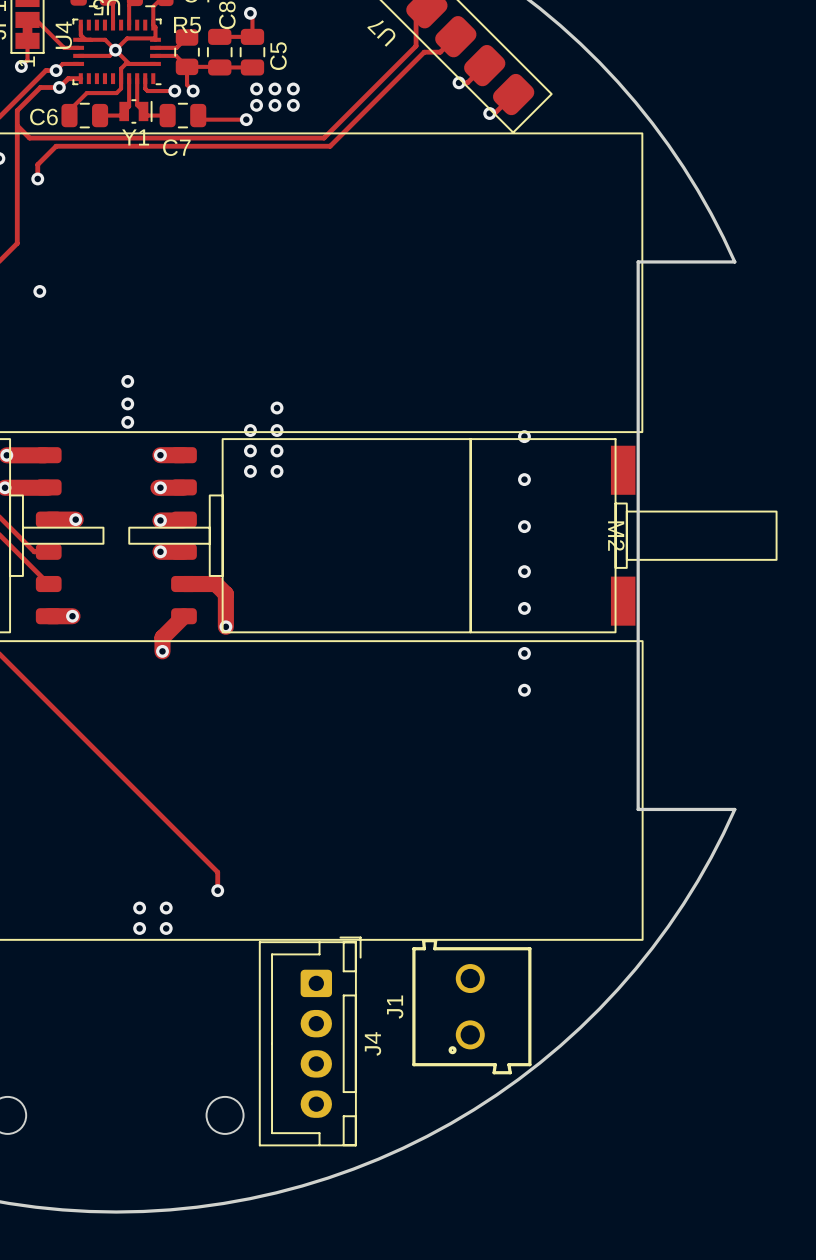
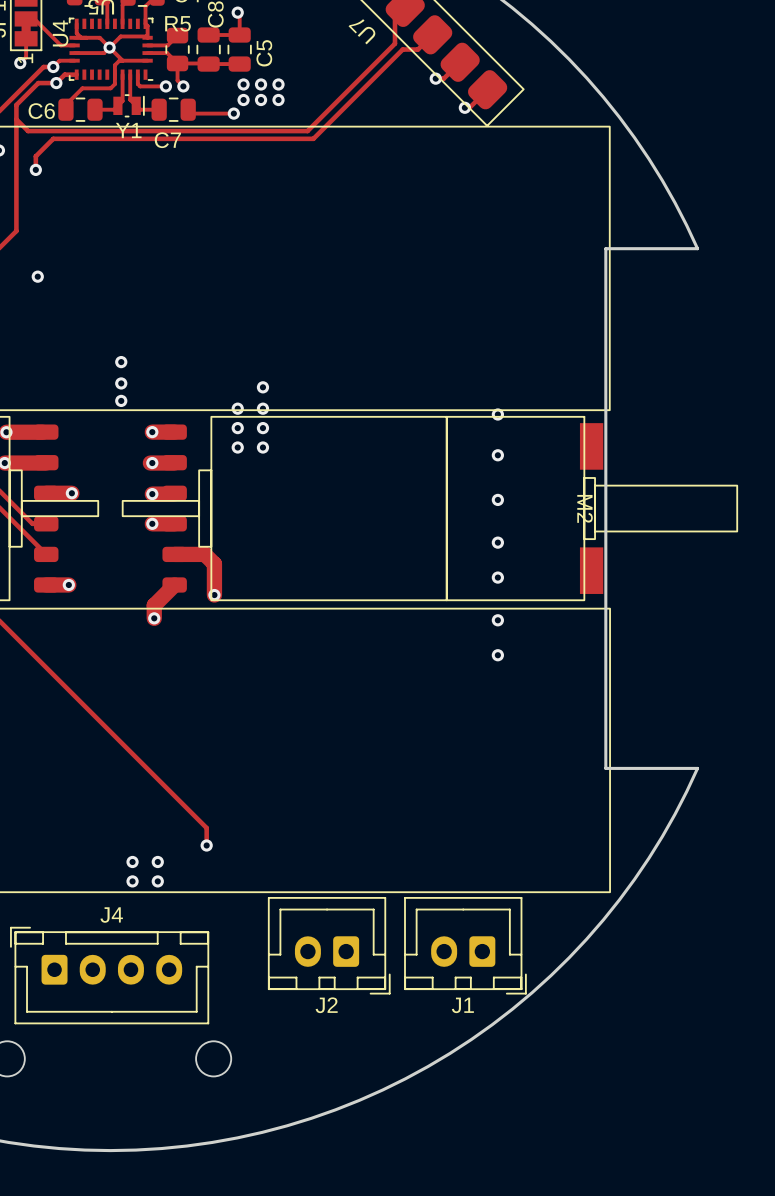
J1 footprint: [412, 939, 532, 1075] -> [404, 896, 527, 995]
J2: none -> (329, 945)
J1 name position: J1 (395, 1007) -> J1 (462, 1005)
J4 rotation: 0° (310, 1041) -> 90° counterclockwise (109, 975)
J4 position: (310, 1041) -> (109, 975)

